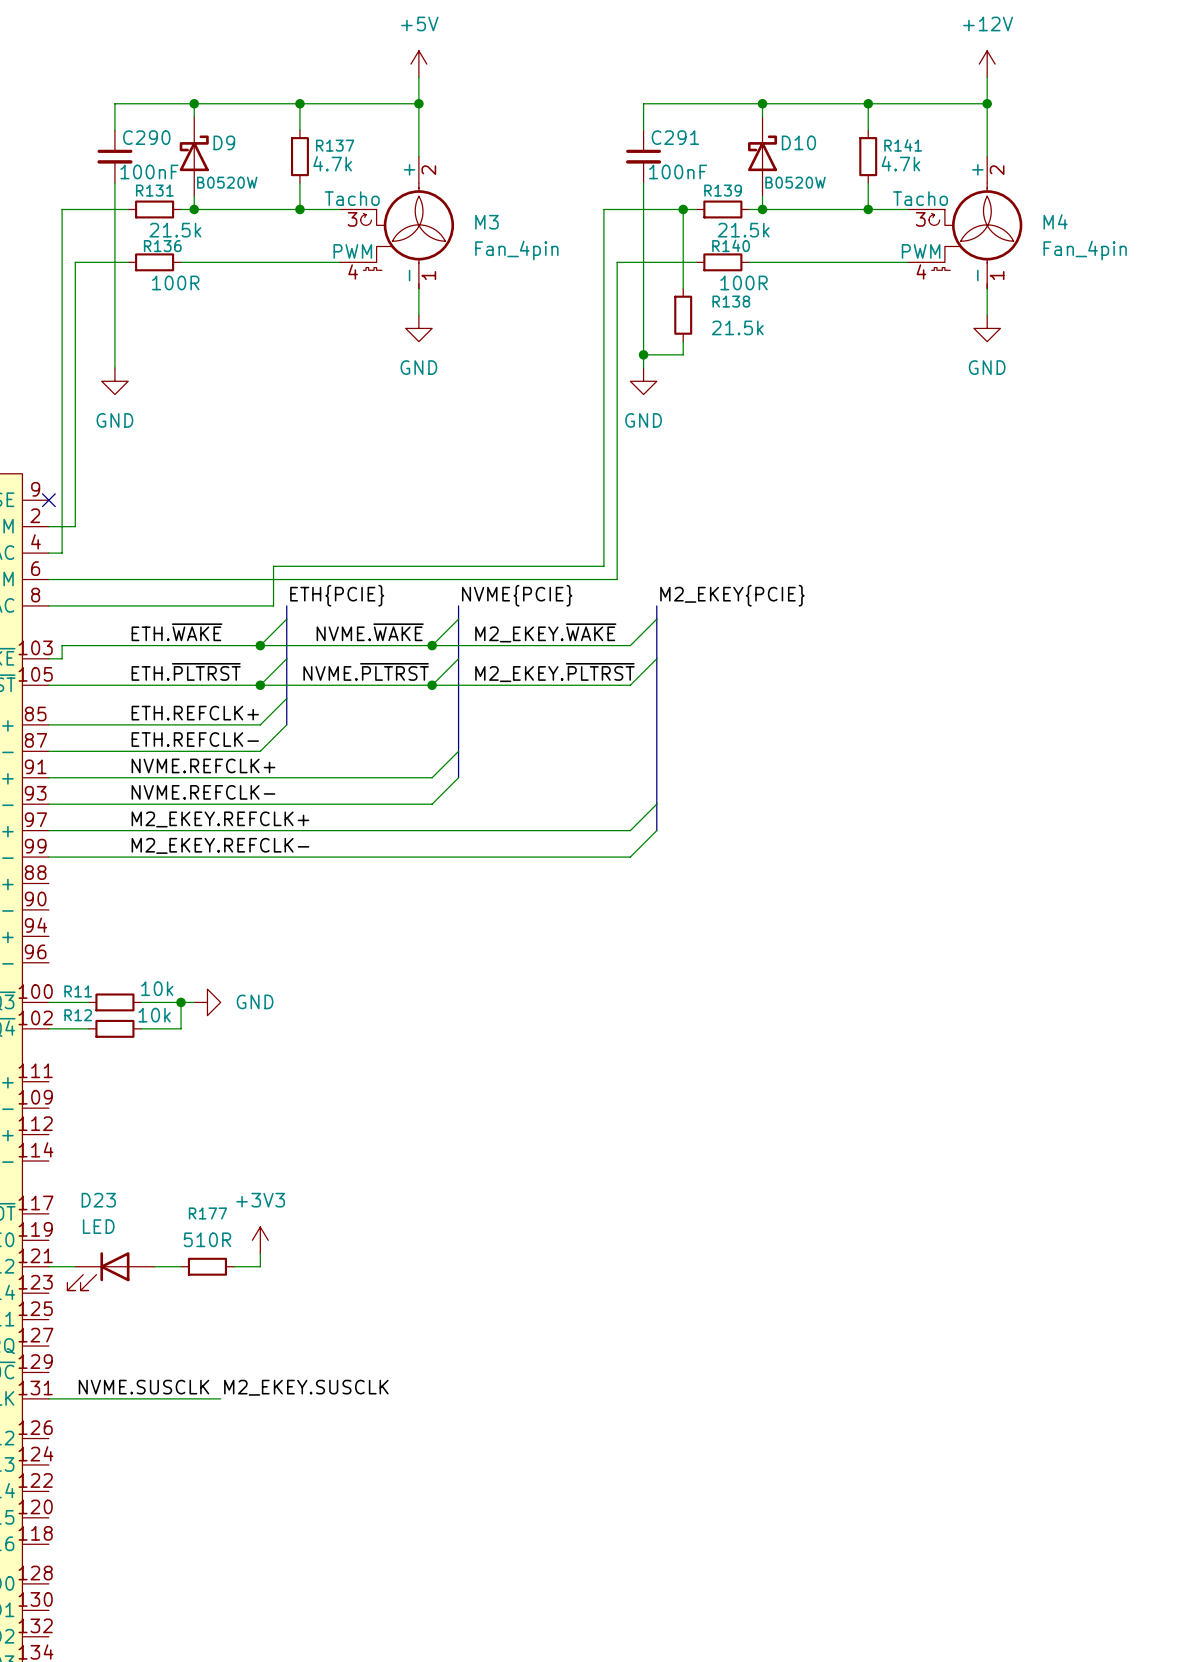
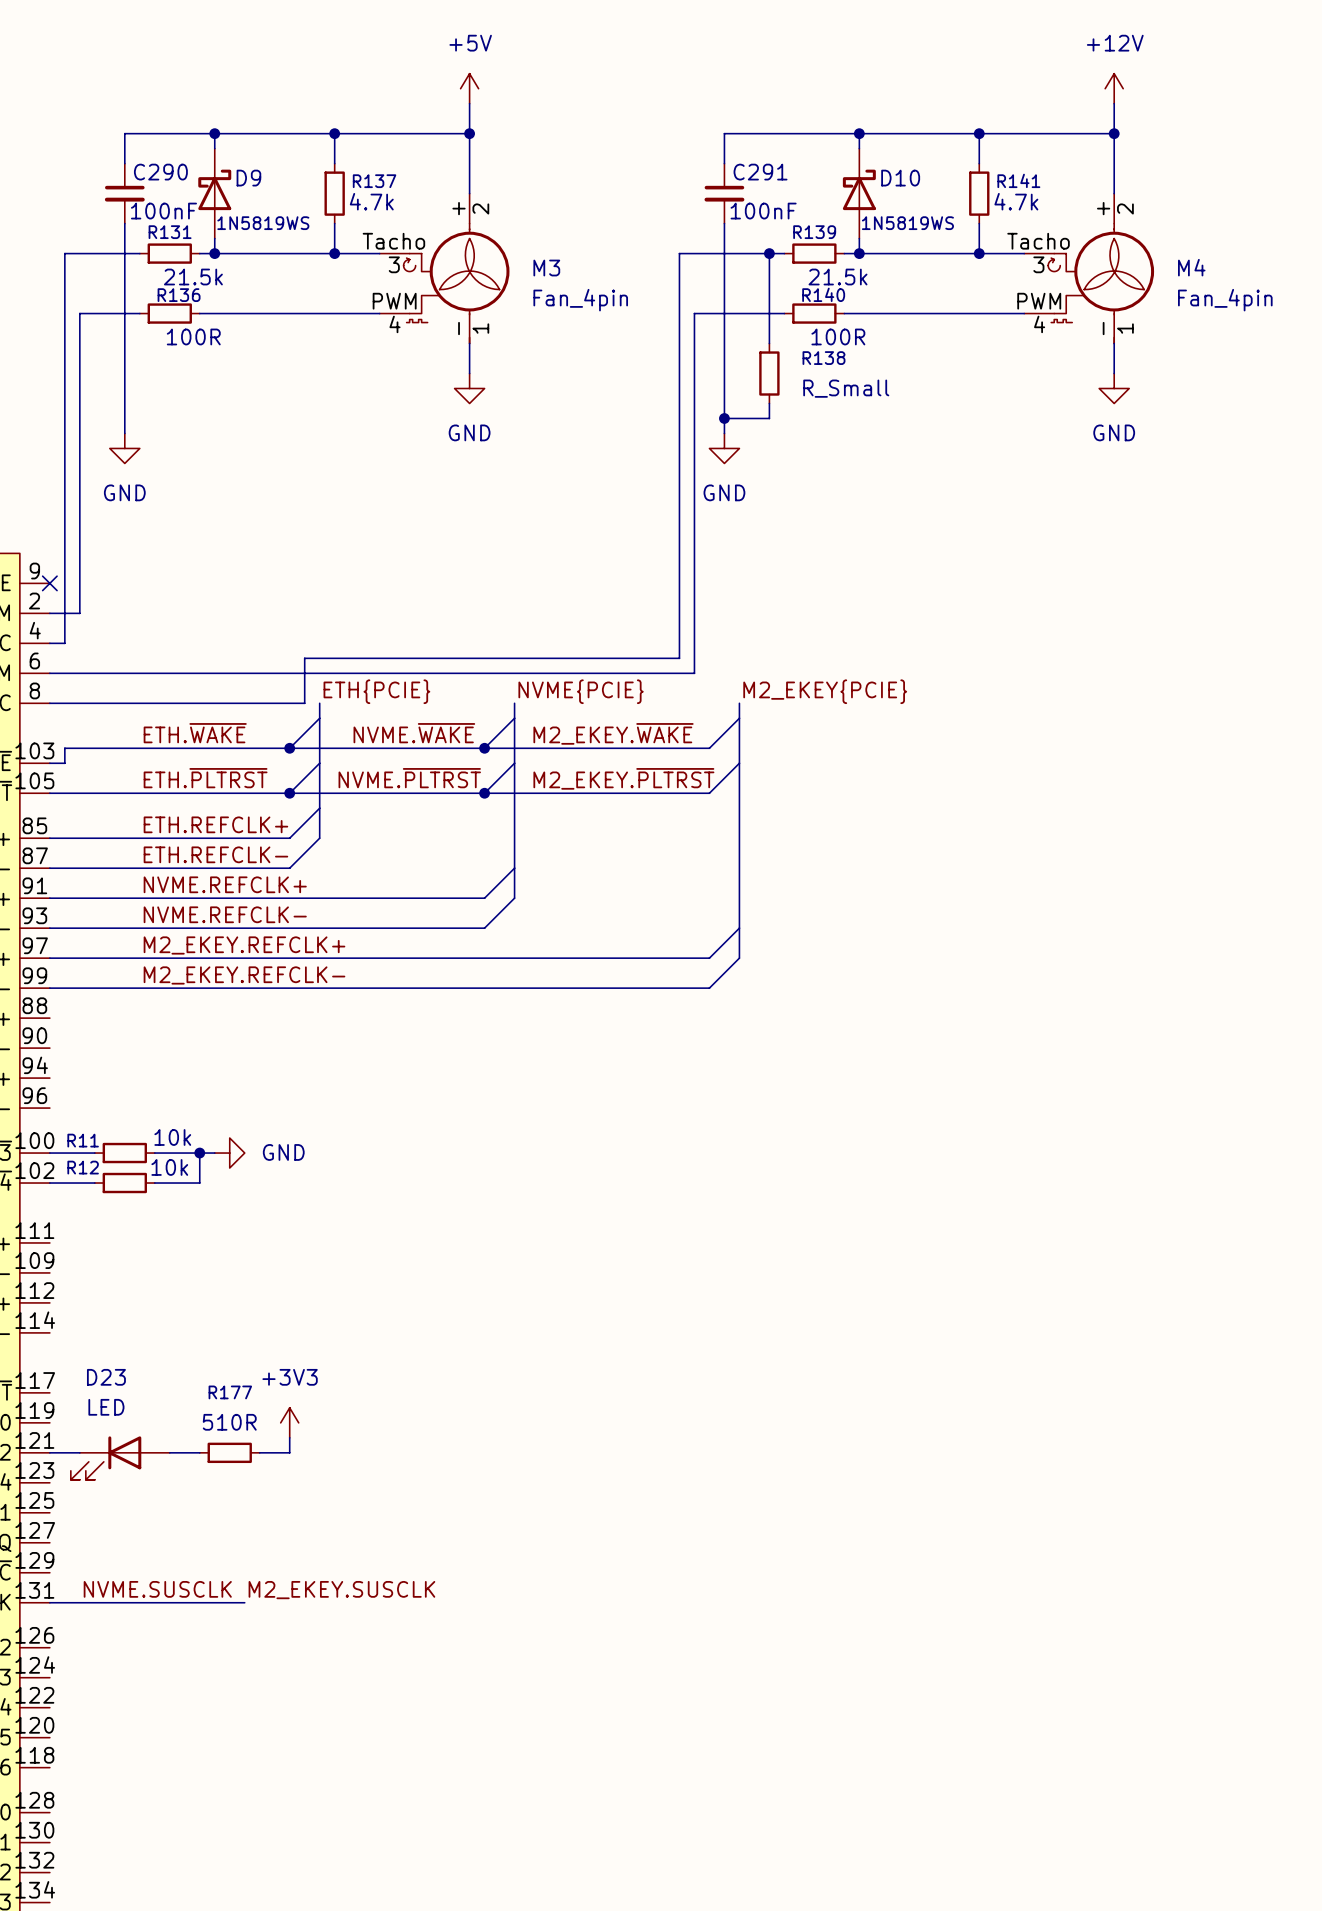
D9 value: B0520W (227, 182) -> 1N5819WS (263, 223)
D10 value: B0520W (795, 182) -> 1N5819WS (907, 223)
R138 value: 21.5k (737, 327) -> R_Small (846, 388)

